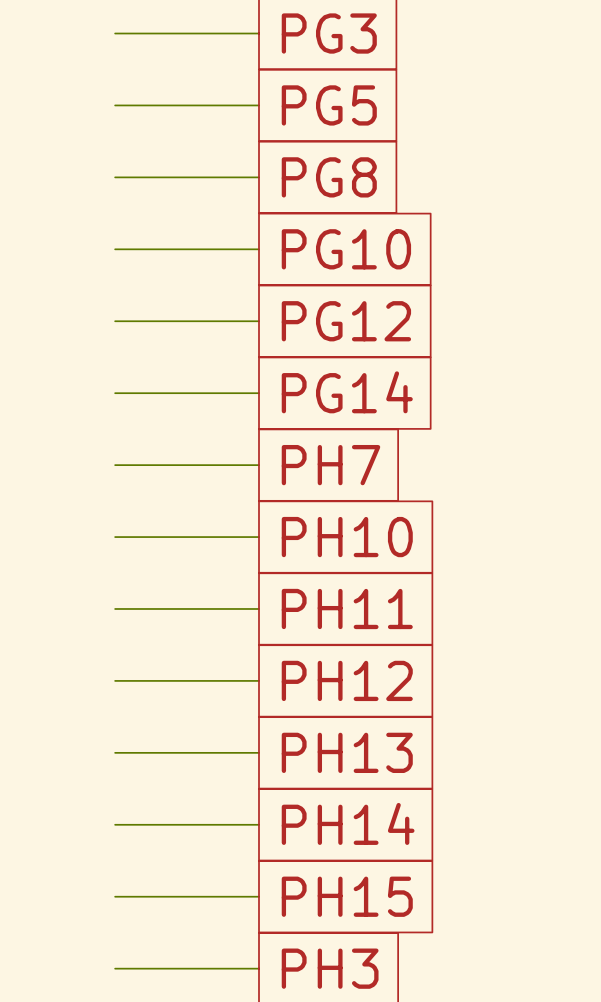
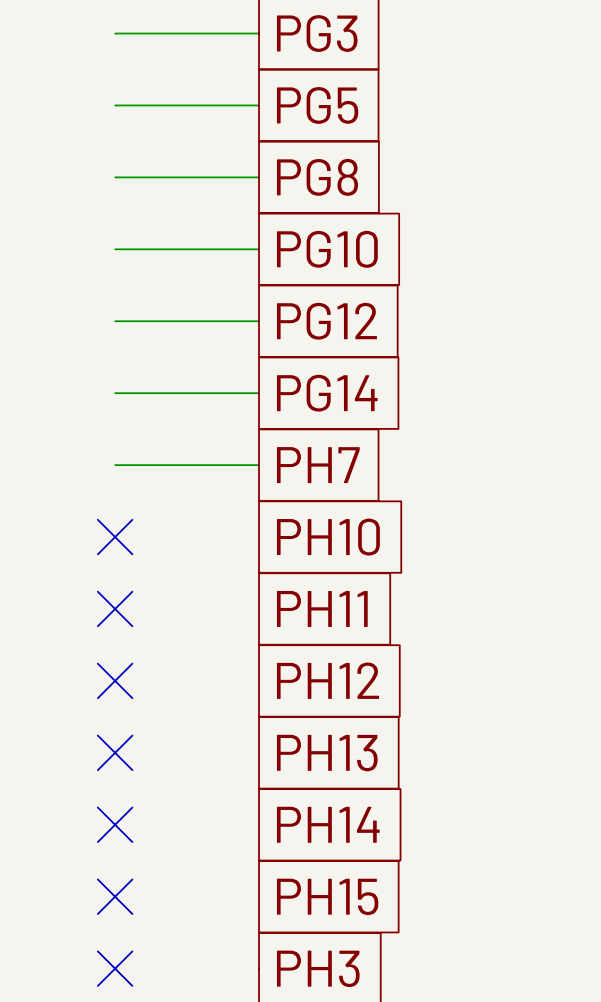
wire: (115, 537) (258, 537) -> none
no-connect mark: none -> (115, 537)
wire: (115, 608) (258, 608) -> none
no-connect mark: none -> (115, 608)
wire: (115, 680) (258, 680) -> none
no-connect mark: none -> (115, 680)
wire: (115, 752) (258, 752) -> none
no-connect mark: none -> (115, 752)
wire: (115, 824) (258, 824) -> none
no-connect mark: none -> (115, 824)
wire: (115, 896) (258, 896) -> none
no-connect mark: none -> (115, 896)
wire: (115, 968) (258, 968) -> none
no-connect mark: none -> (115, 968)

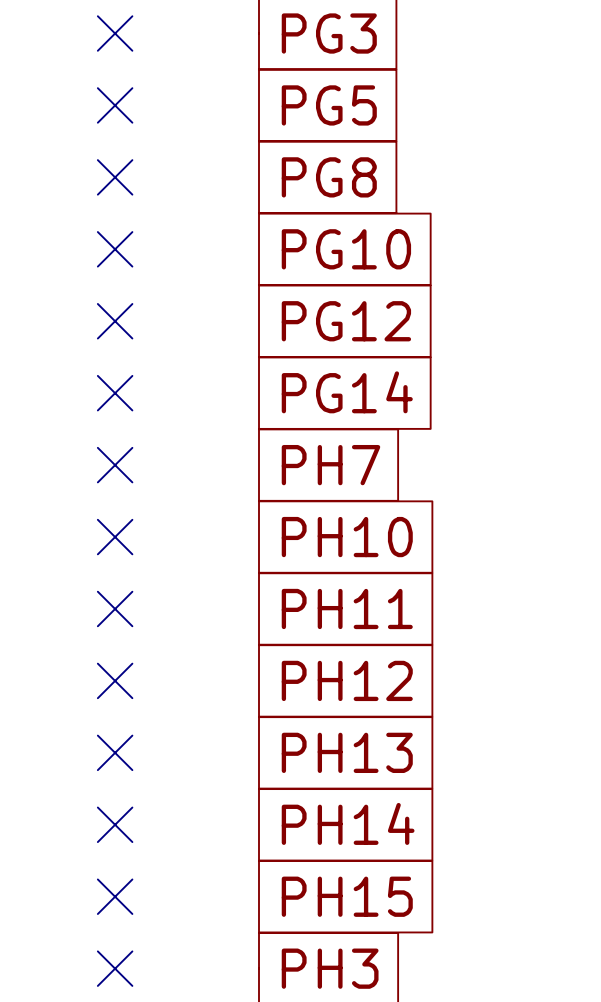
wire: (115, 33) (258, 33) -> none
no-connect mark: none -> (115, 33)
wire: (115, 105) (258, 105) -> none
no-connect mark: none -> (115, 105)
wire: (115, 177) (258, 177) -> none
no-connect mark: none -> (115, 177)
wire: (115, 249) (258, 249) -> none
no-connect mark: none -> (115, 249)
wire: (115, 321) (258, 321) -> none
no-connect mark: none -> (115, 321)
wire: (115, 393) (258, 393) -> none
no-connect mark: none -> (115, 393)
wire: (115, 465) (258, 465) -> none
no-connect mark: none -> (115, 465)

